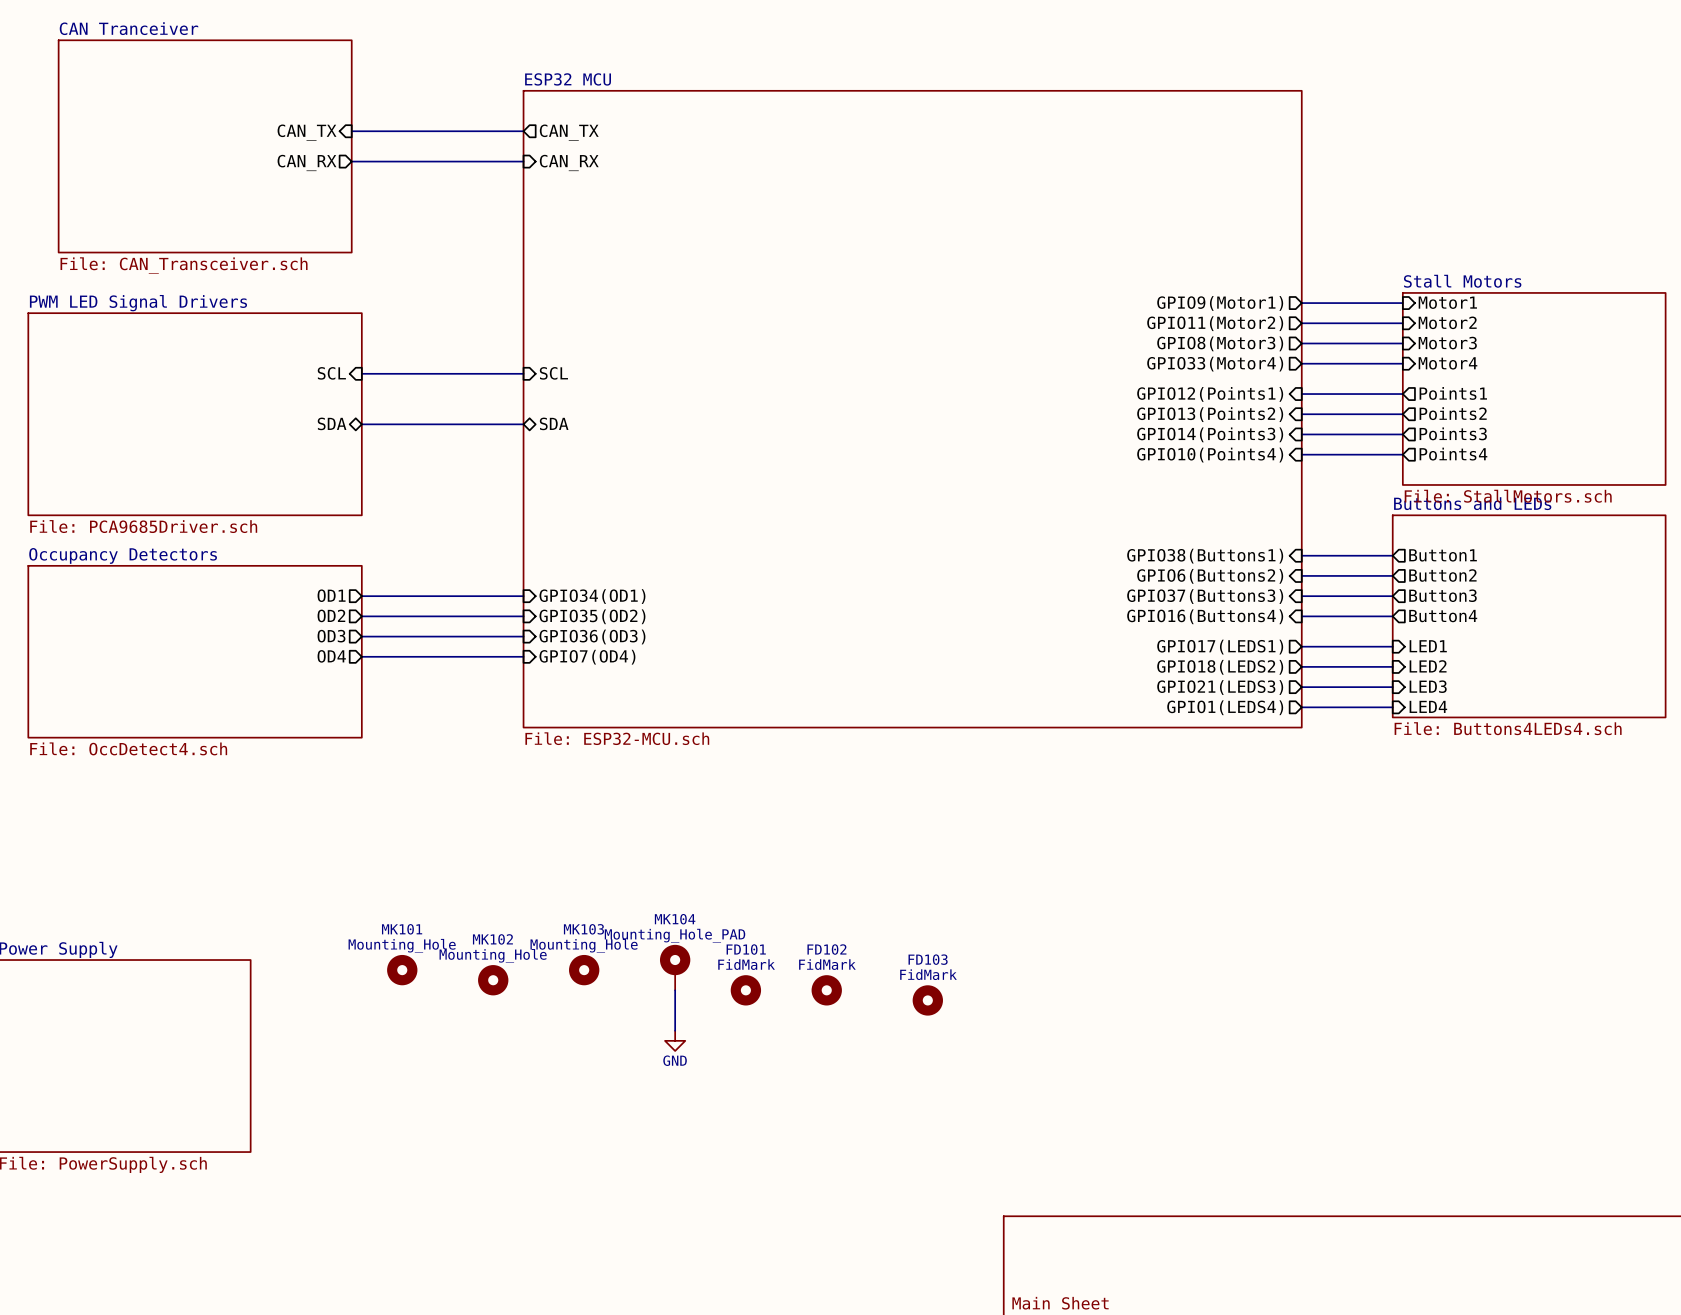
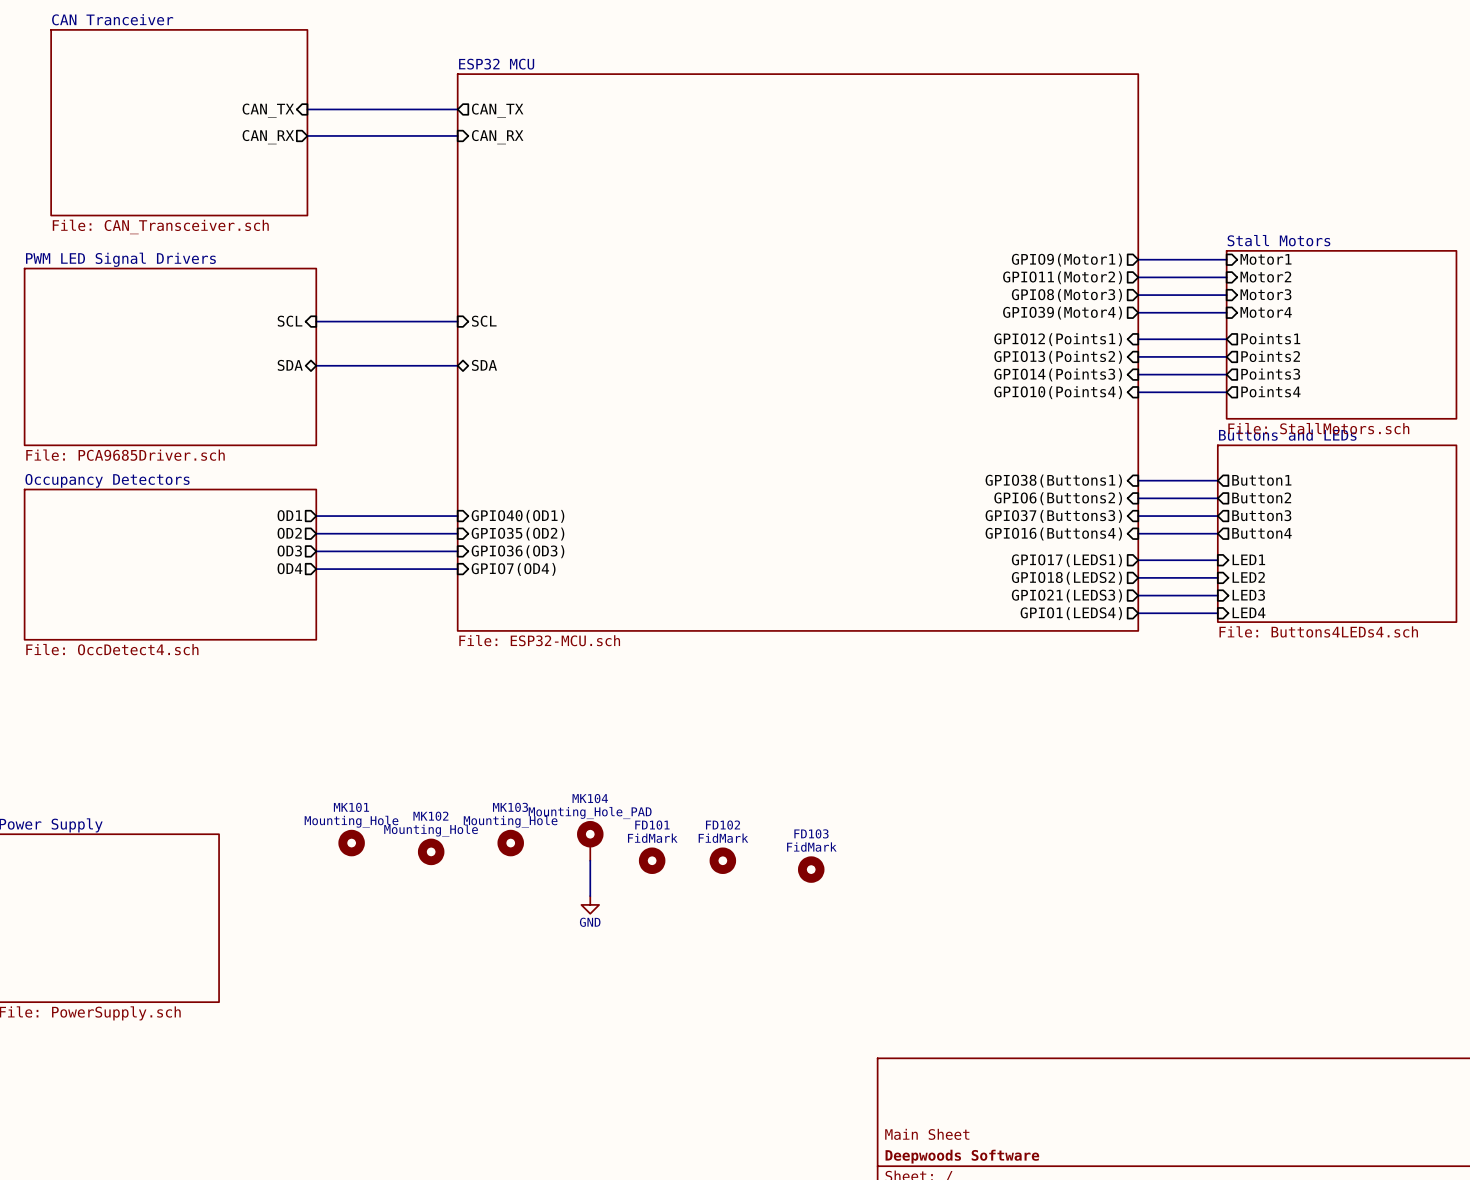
sheet pin: GPIO33(Motor4) (1215, 364) -> GPIO39(Motor4) (1062, 313)
sheet pin: GPIO34(OD1) (592, 596) -> GPIO40(OD1) (517, 516)

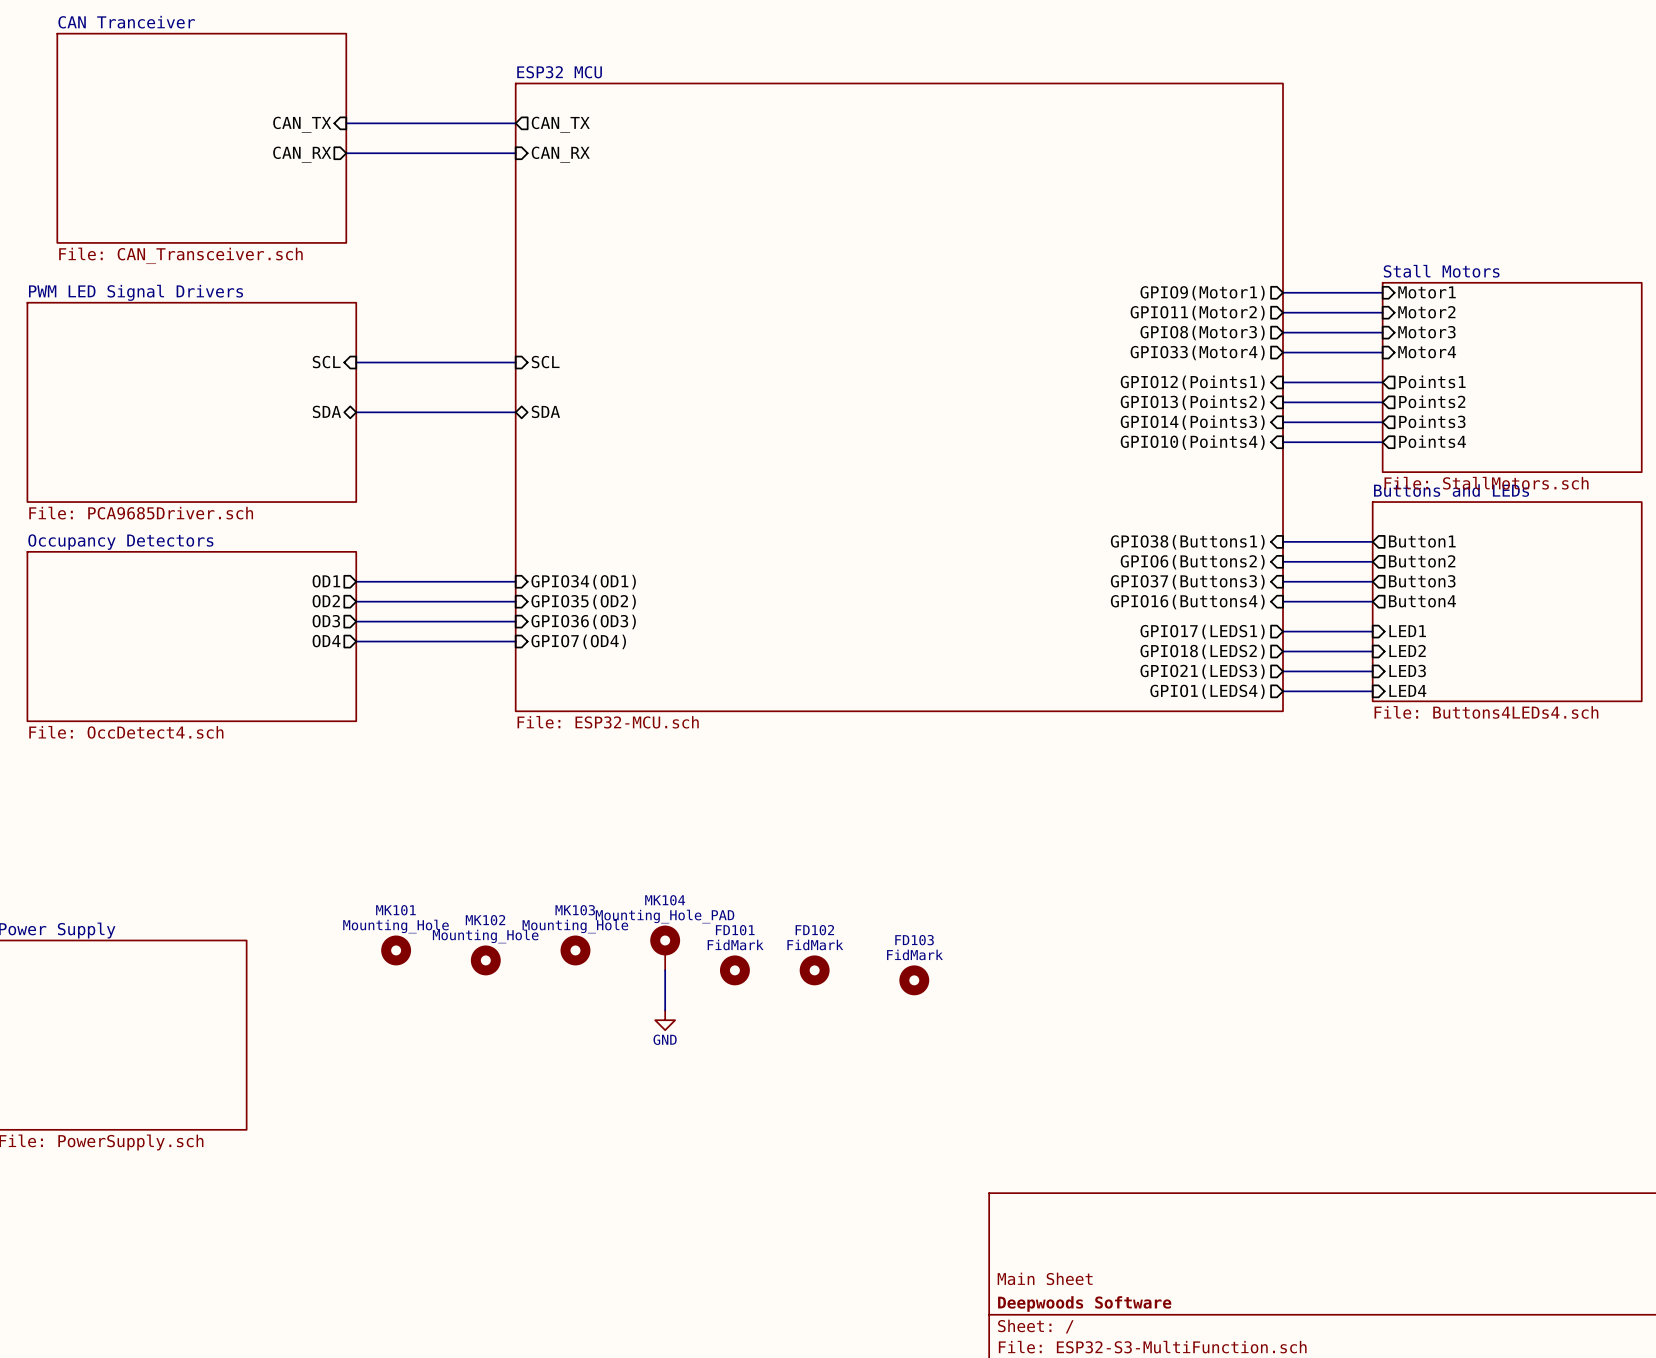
sheet pin: GPIO39(Motor4) (1062, 313) -> GPIO33(Motor4) (1197, 352)
sheet pin: GPIO40(OD1) (517, 516) -> GPIO34(OD1) (583, 582)

